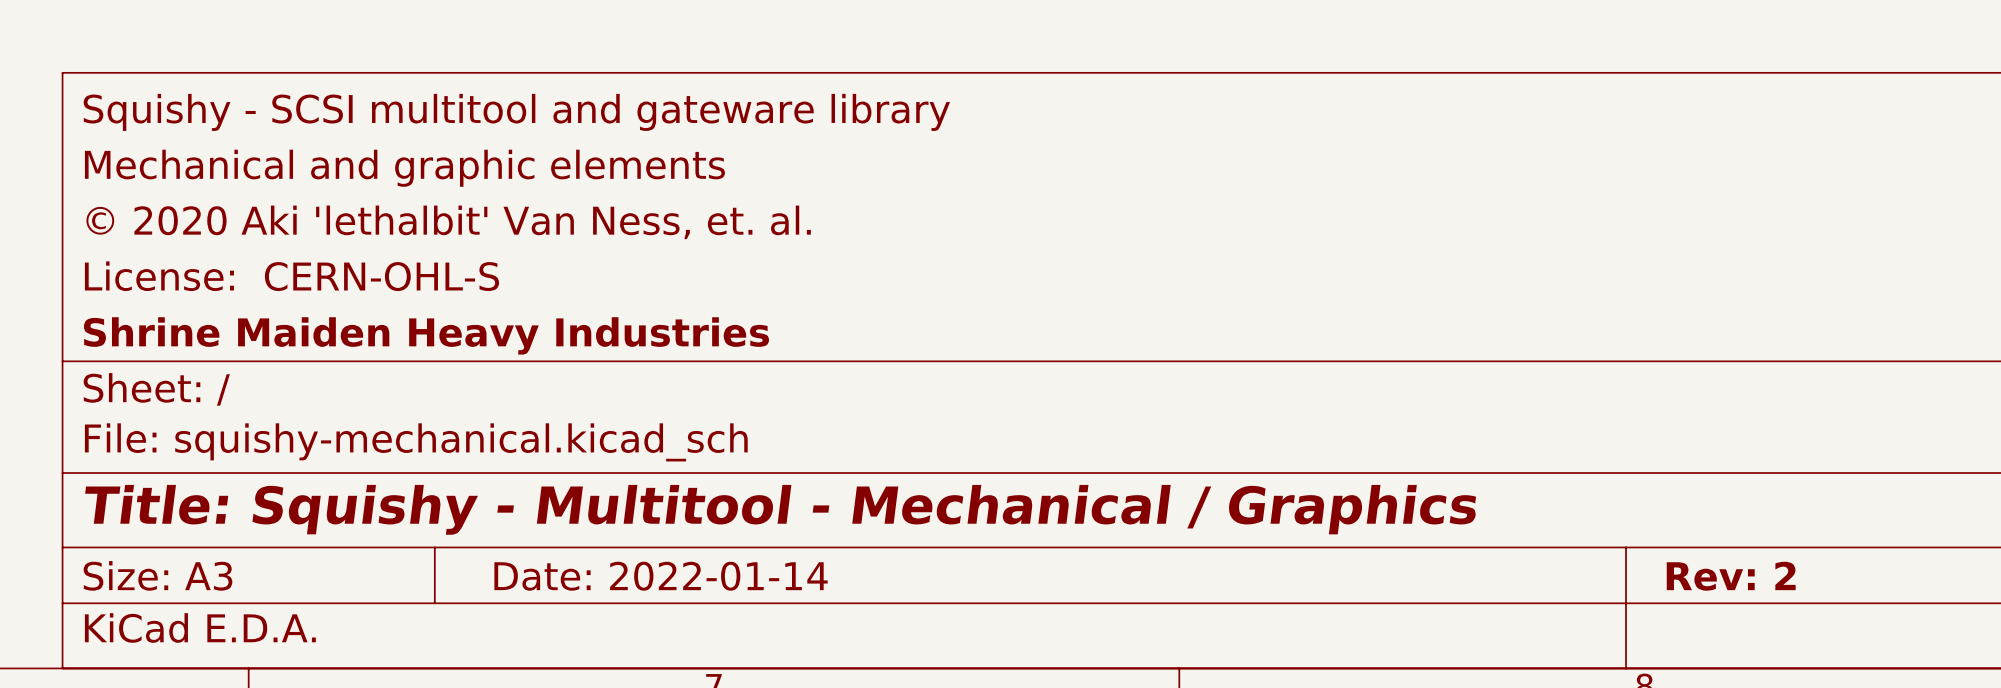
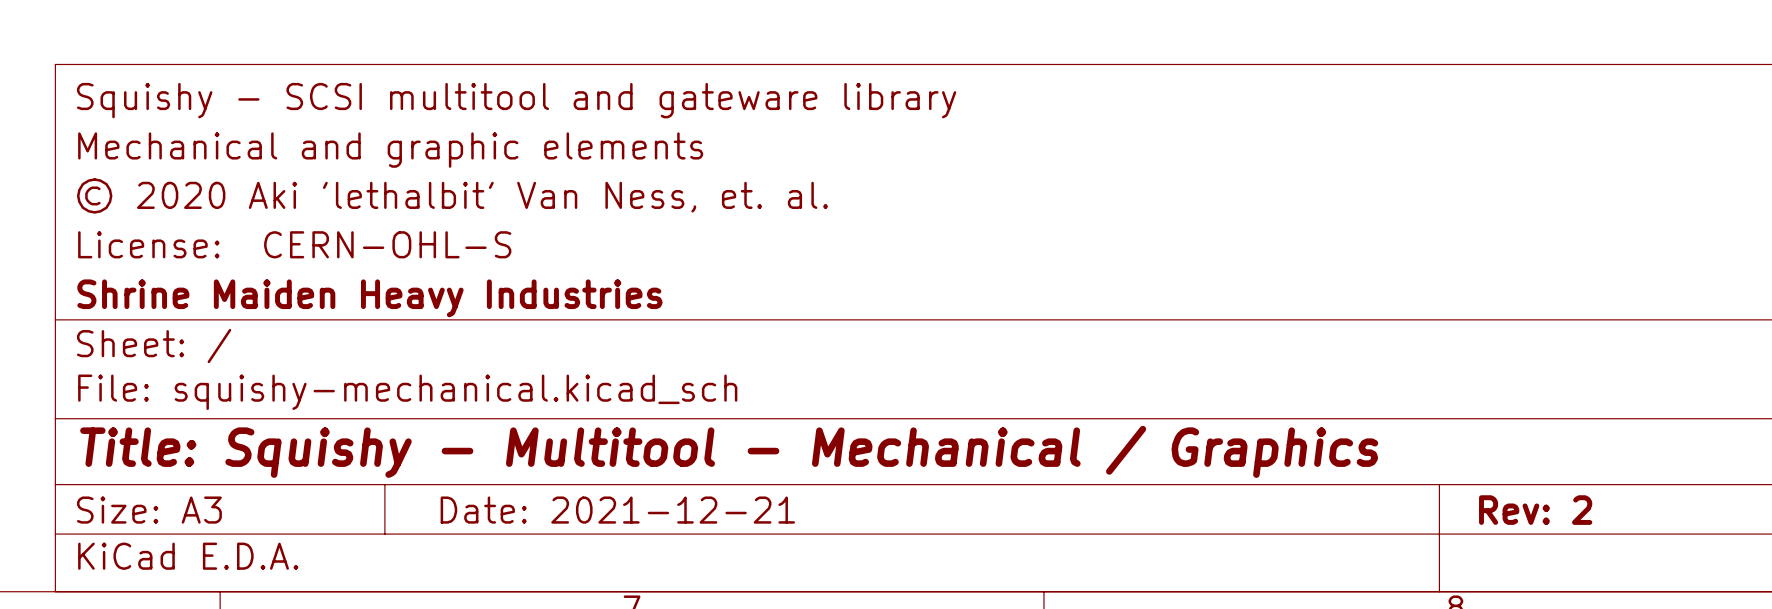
title block: Date: 2022-01-14 (661, 576) -> Date: 2021-12-21 (617, 510)

